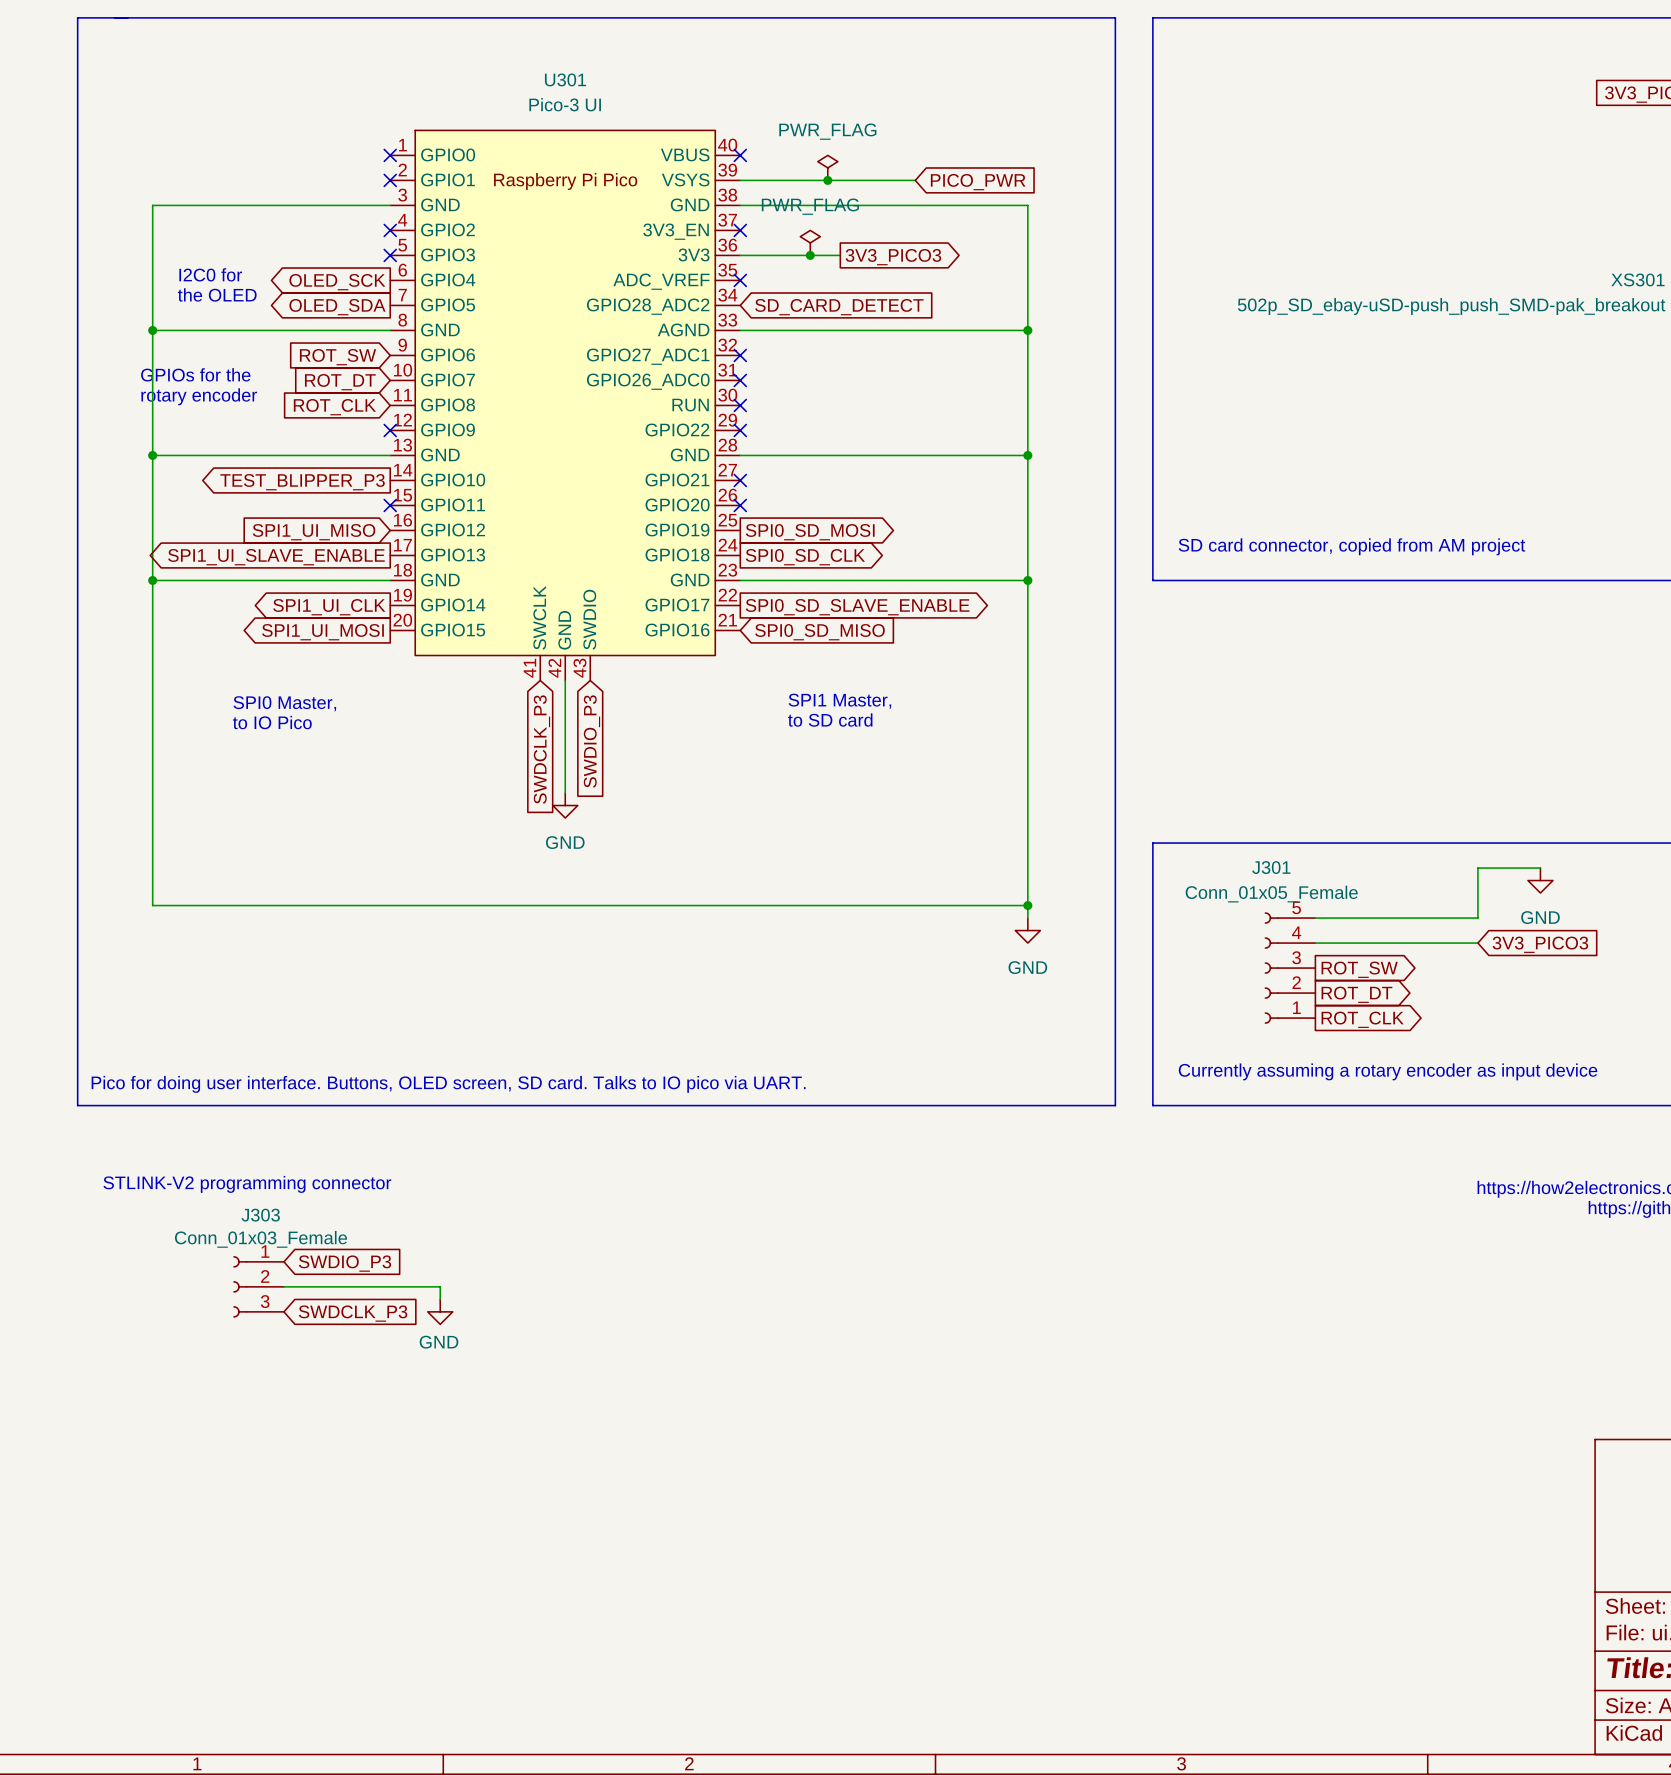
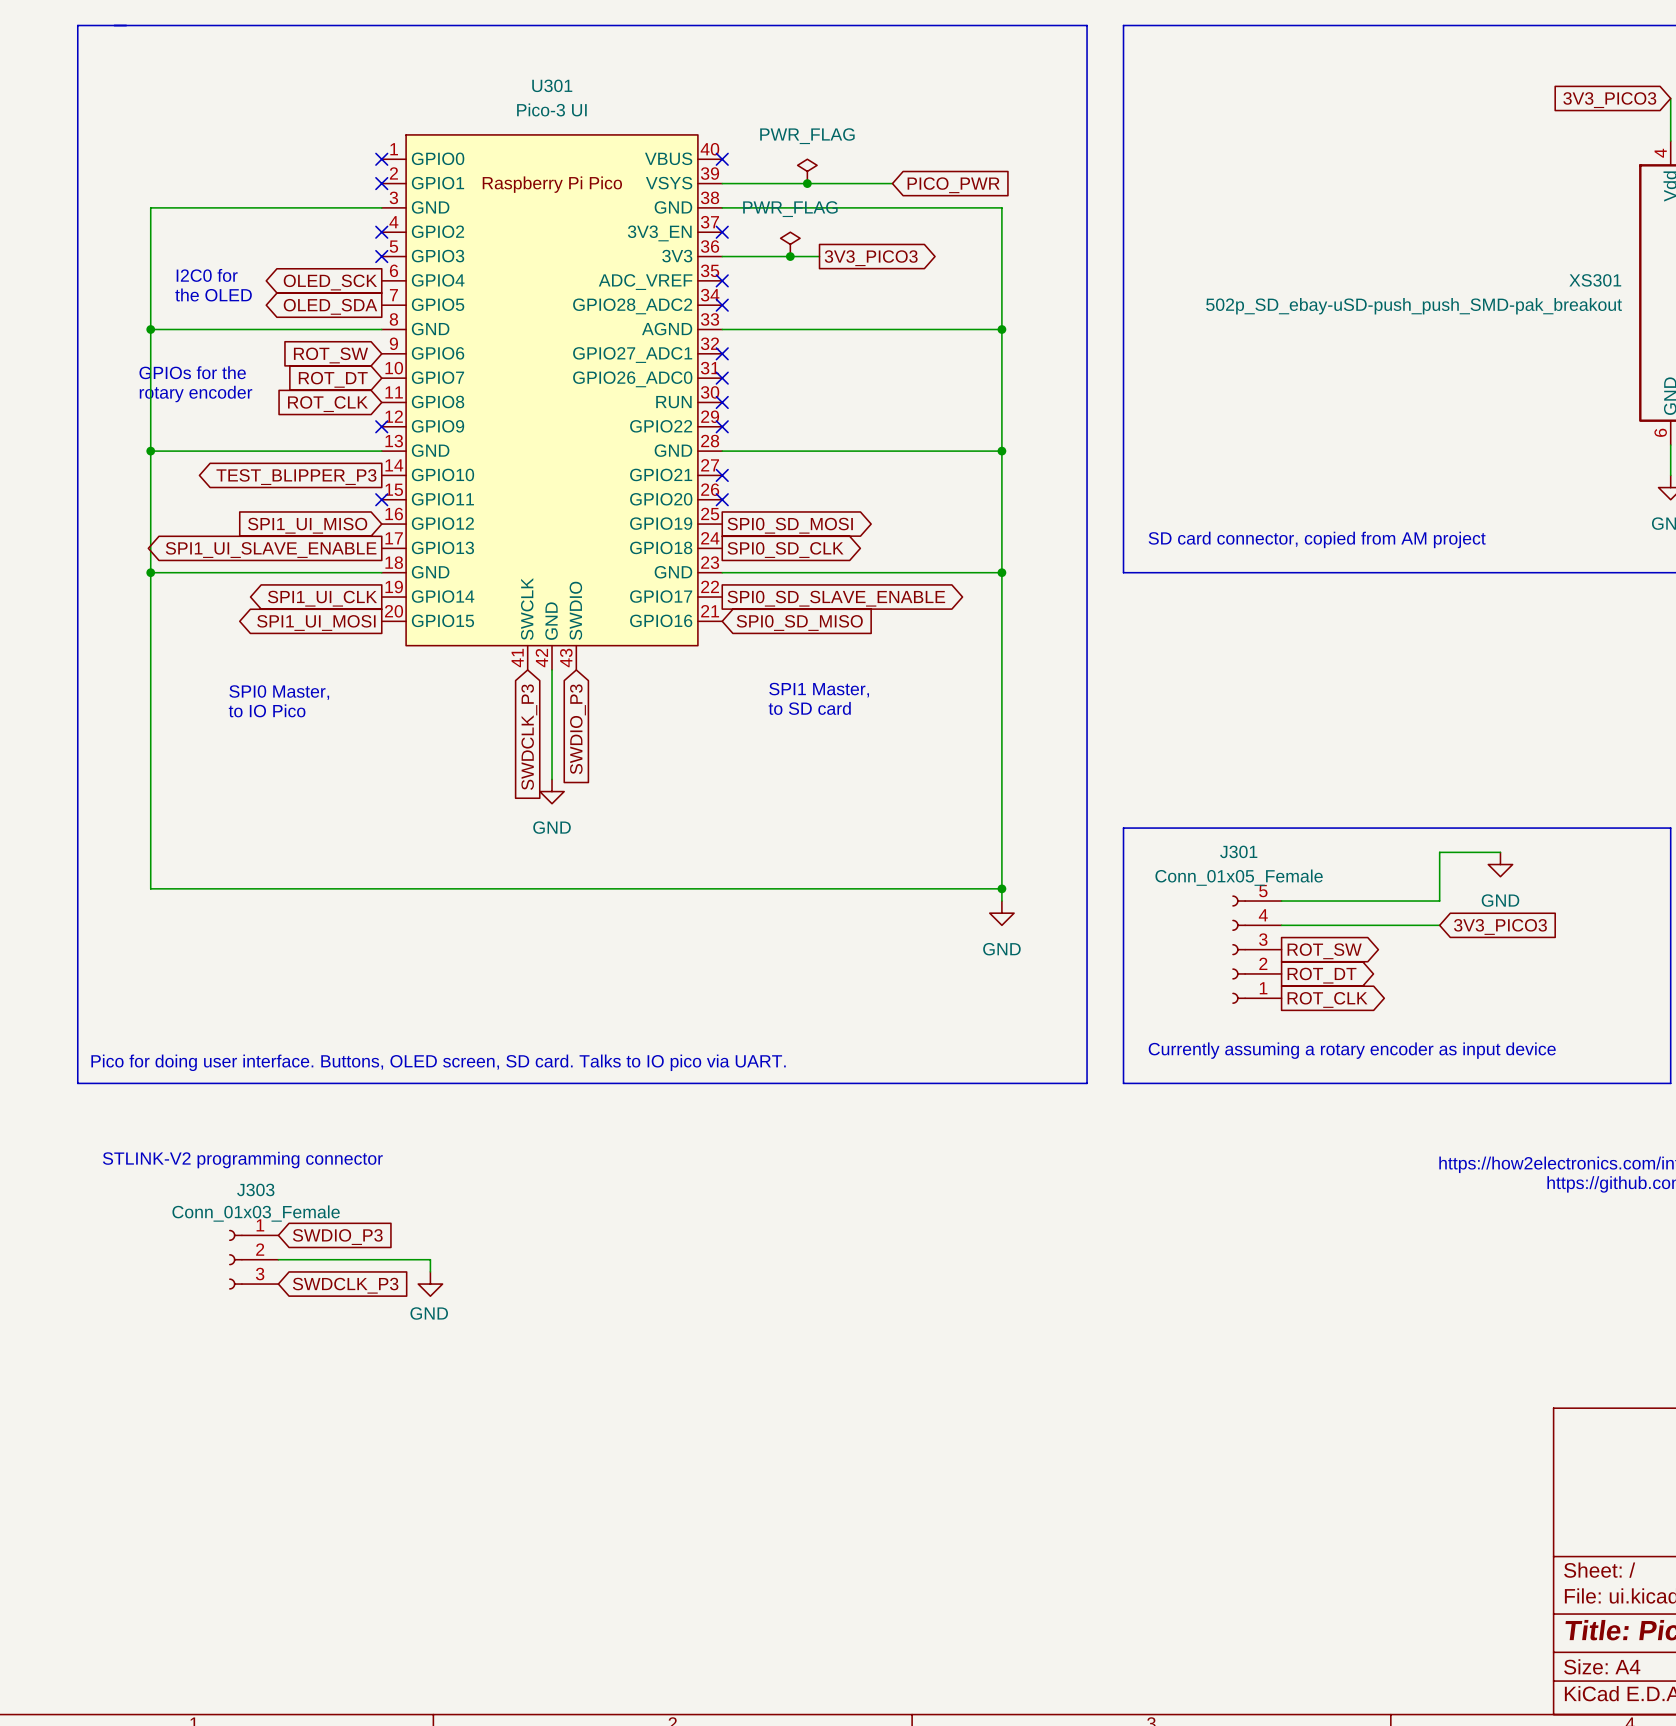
no-connect mark: none -> (722, 305)
global label: SD_CARD_DETECT (839, 307) -> none

